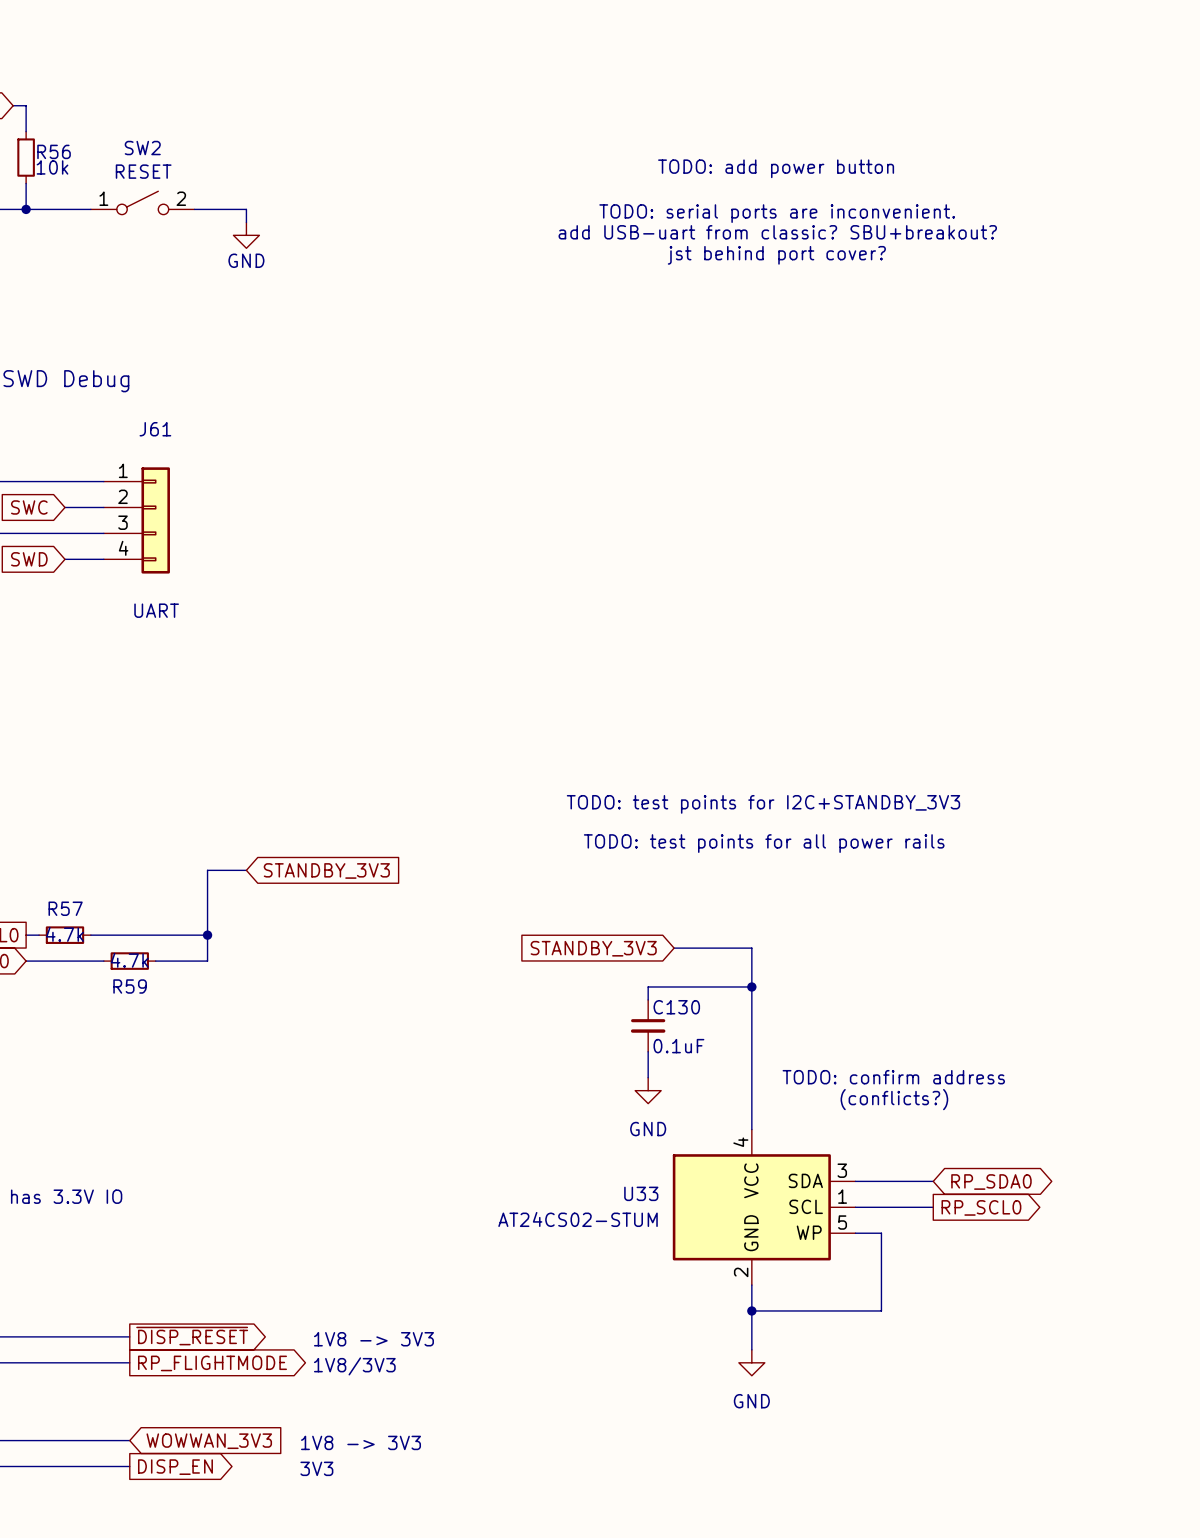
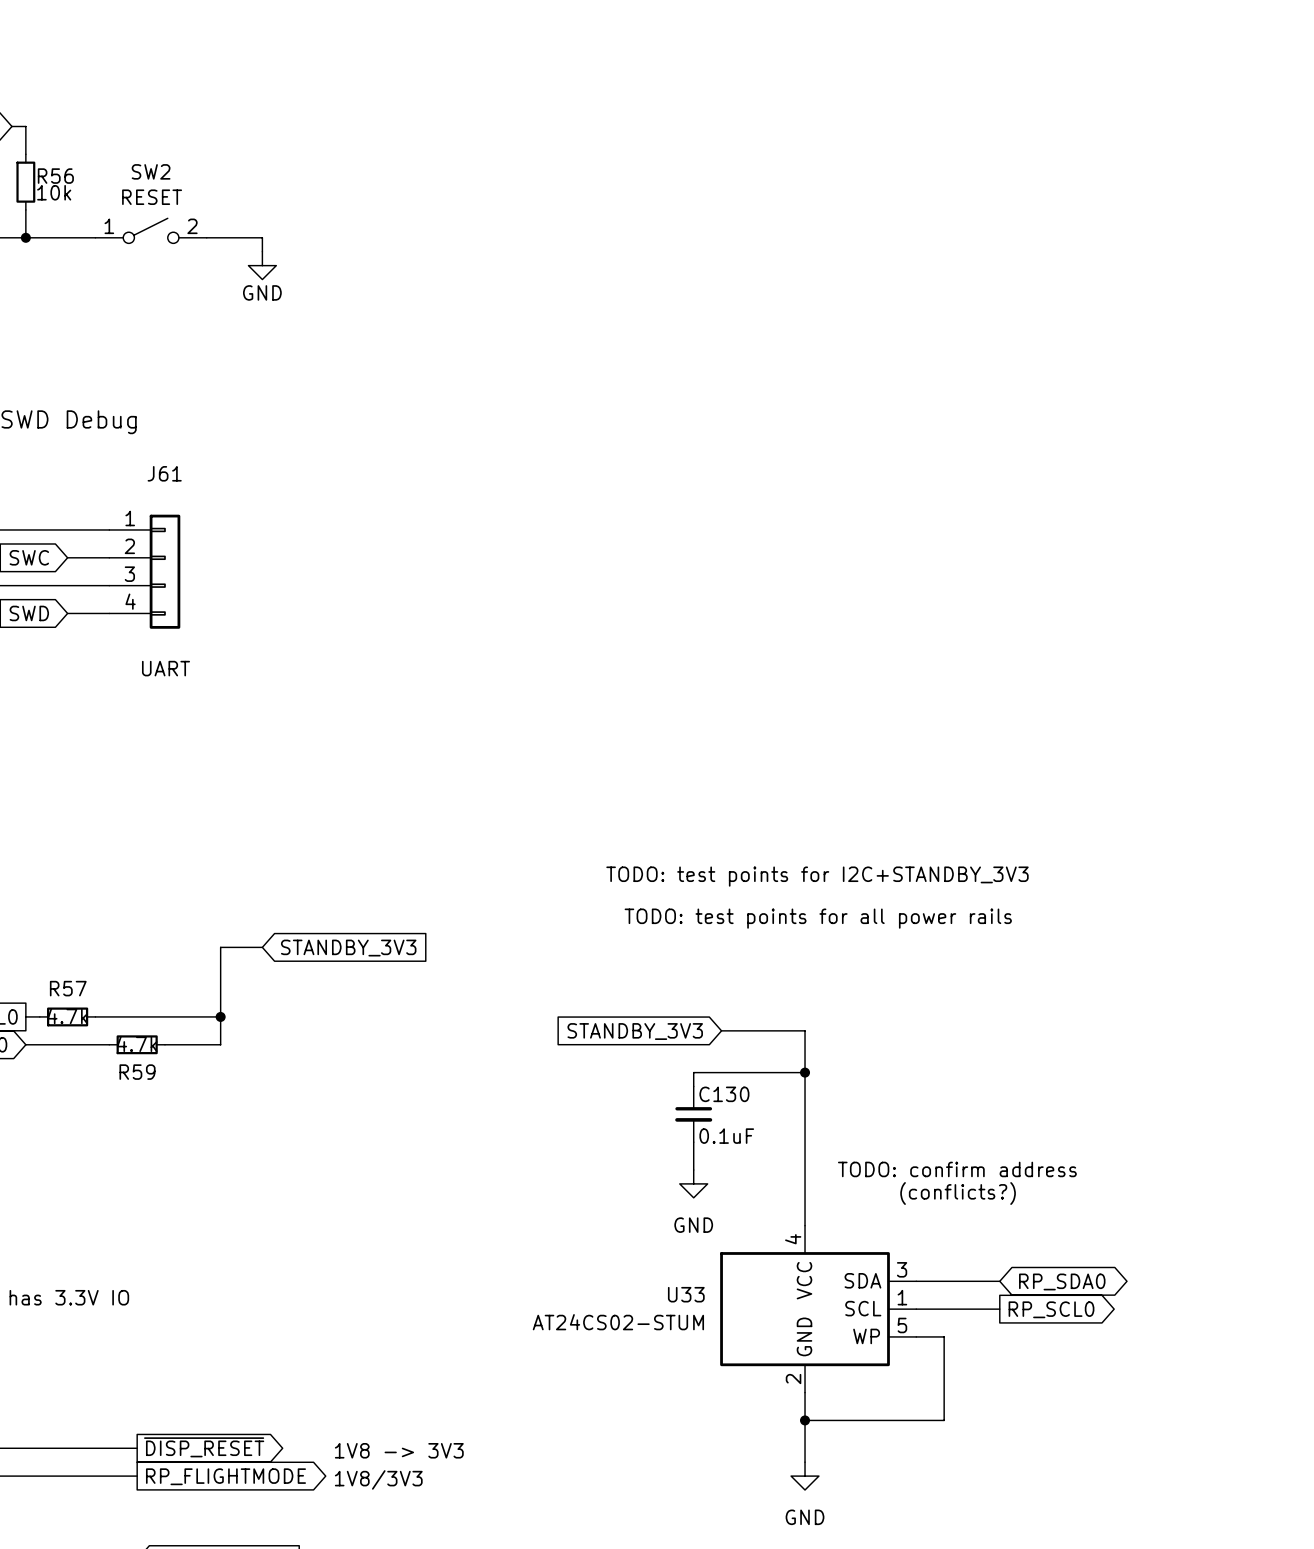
text: TODO: add power button (776, 168) -> none
text: TODO: serial ports are inconvenient. (777, 213) -> none
text: add USB-uart from classic? SBU+breakout? (777, 232) -> none
text: jst behind port cover? (776, 255) -> none

